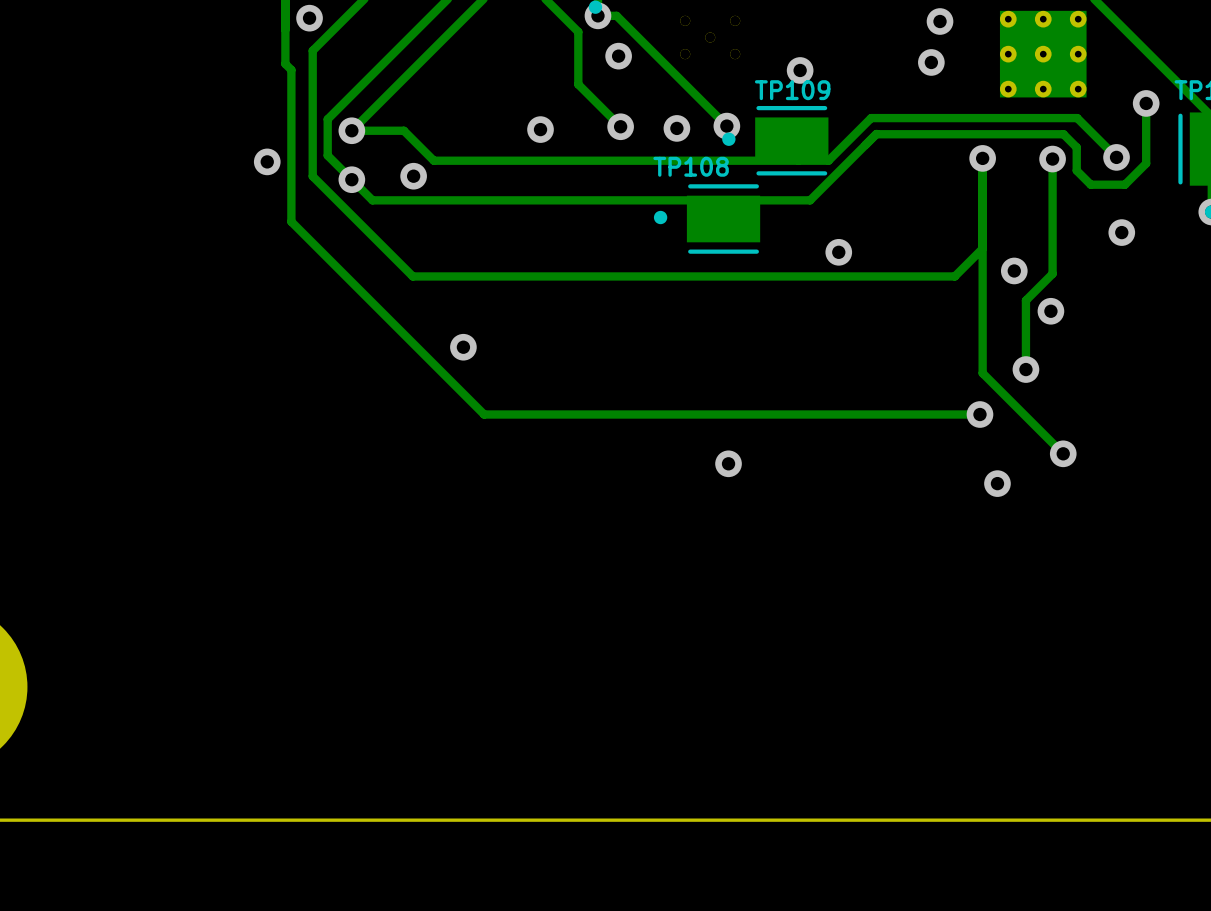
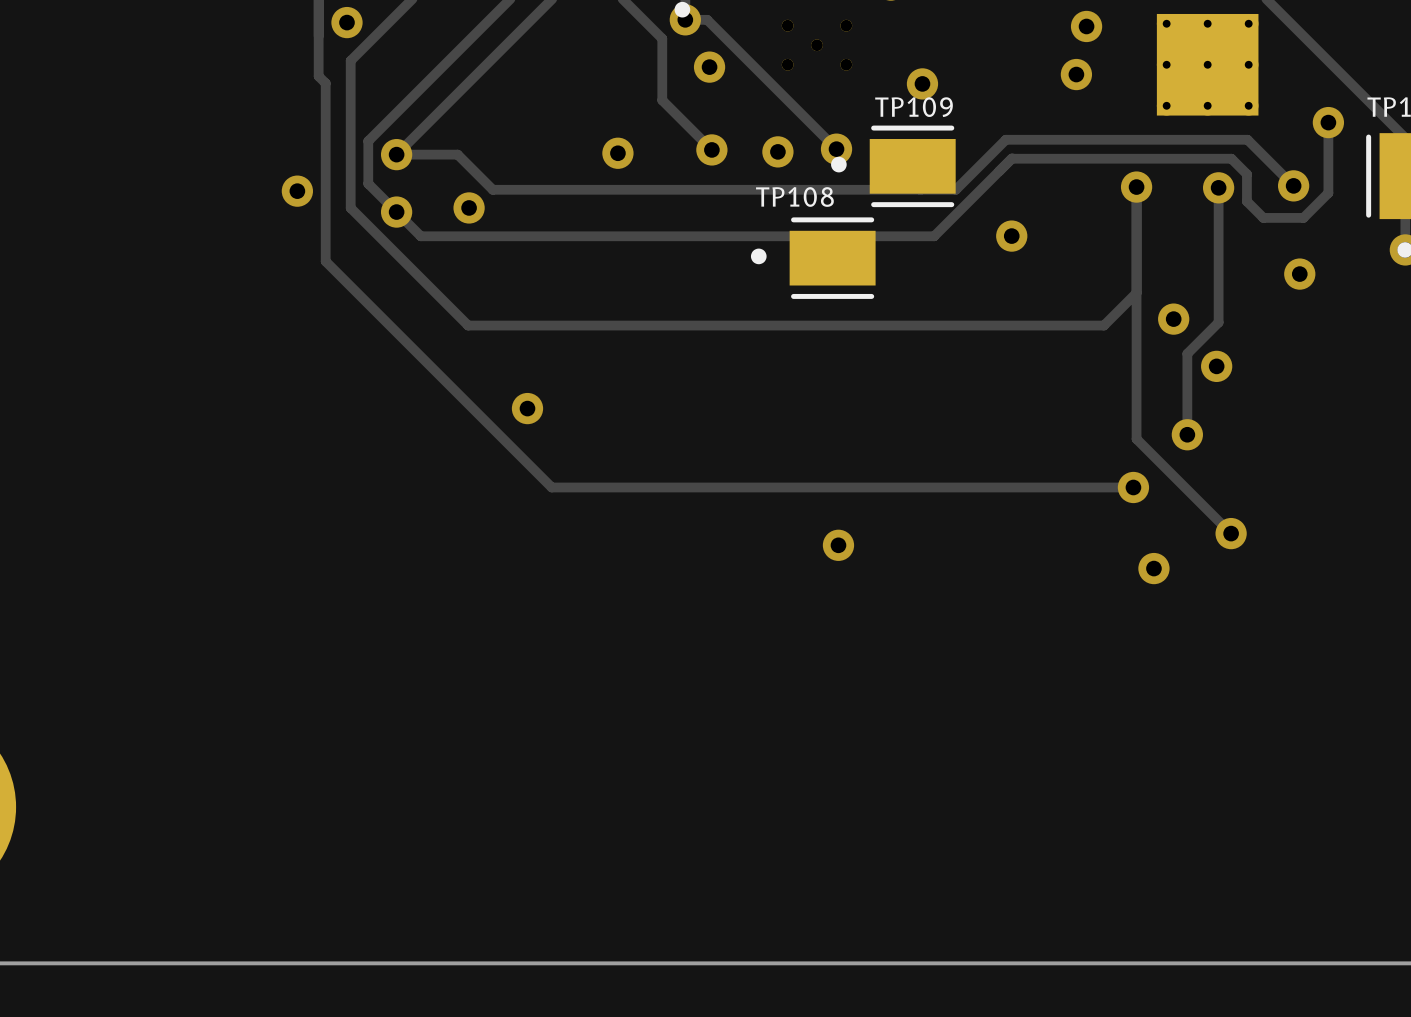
via position: (838, 252) -> (1011, 236)

